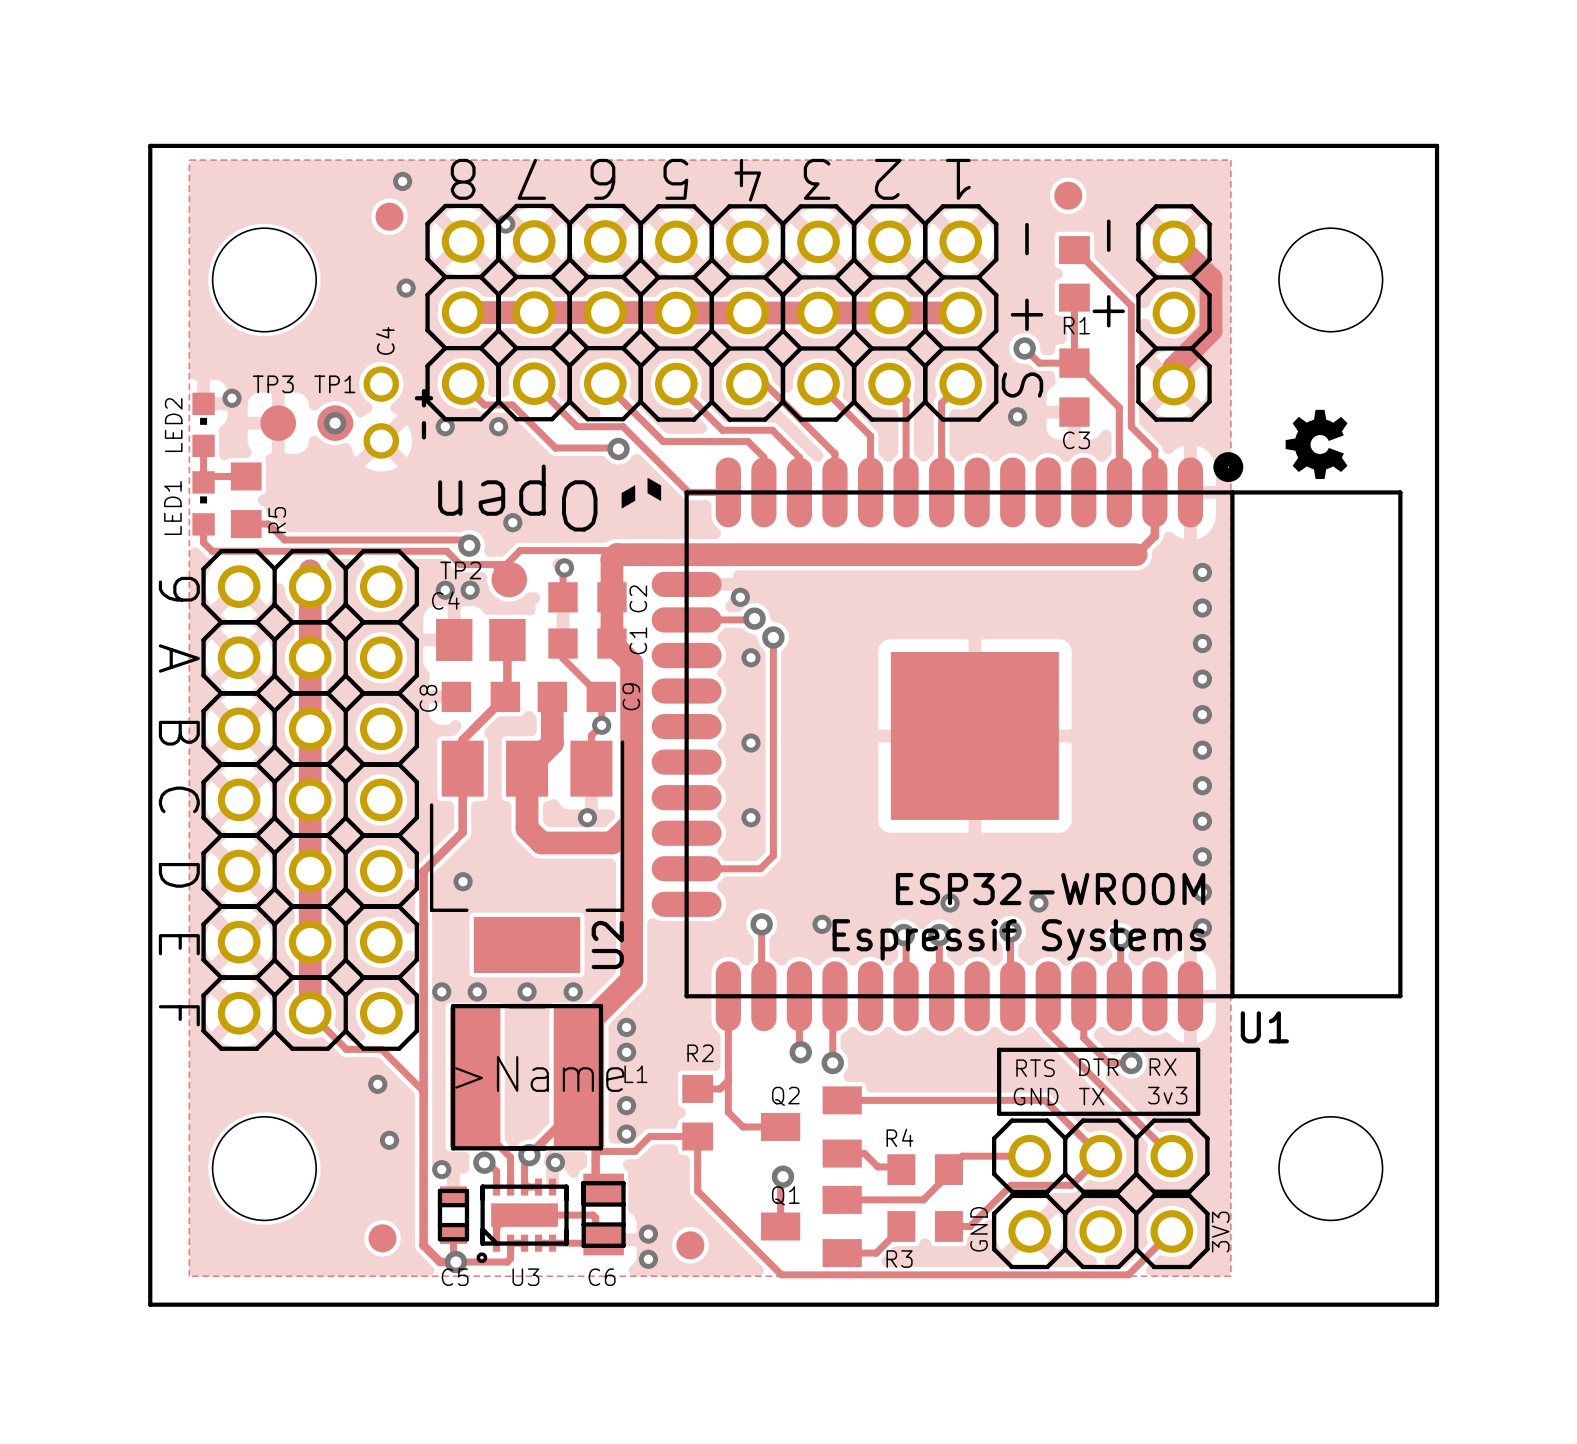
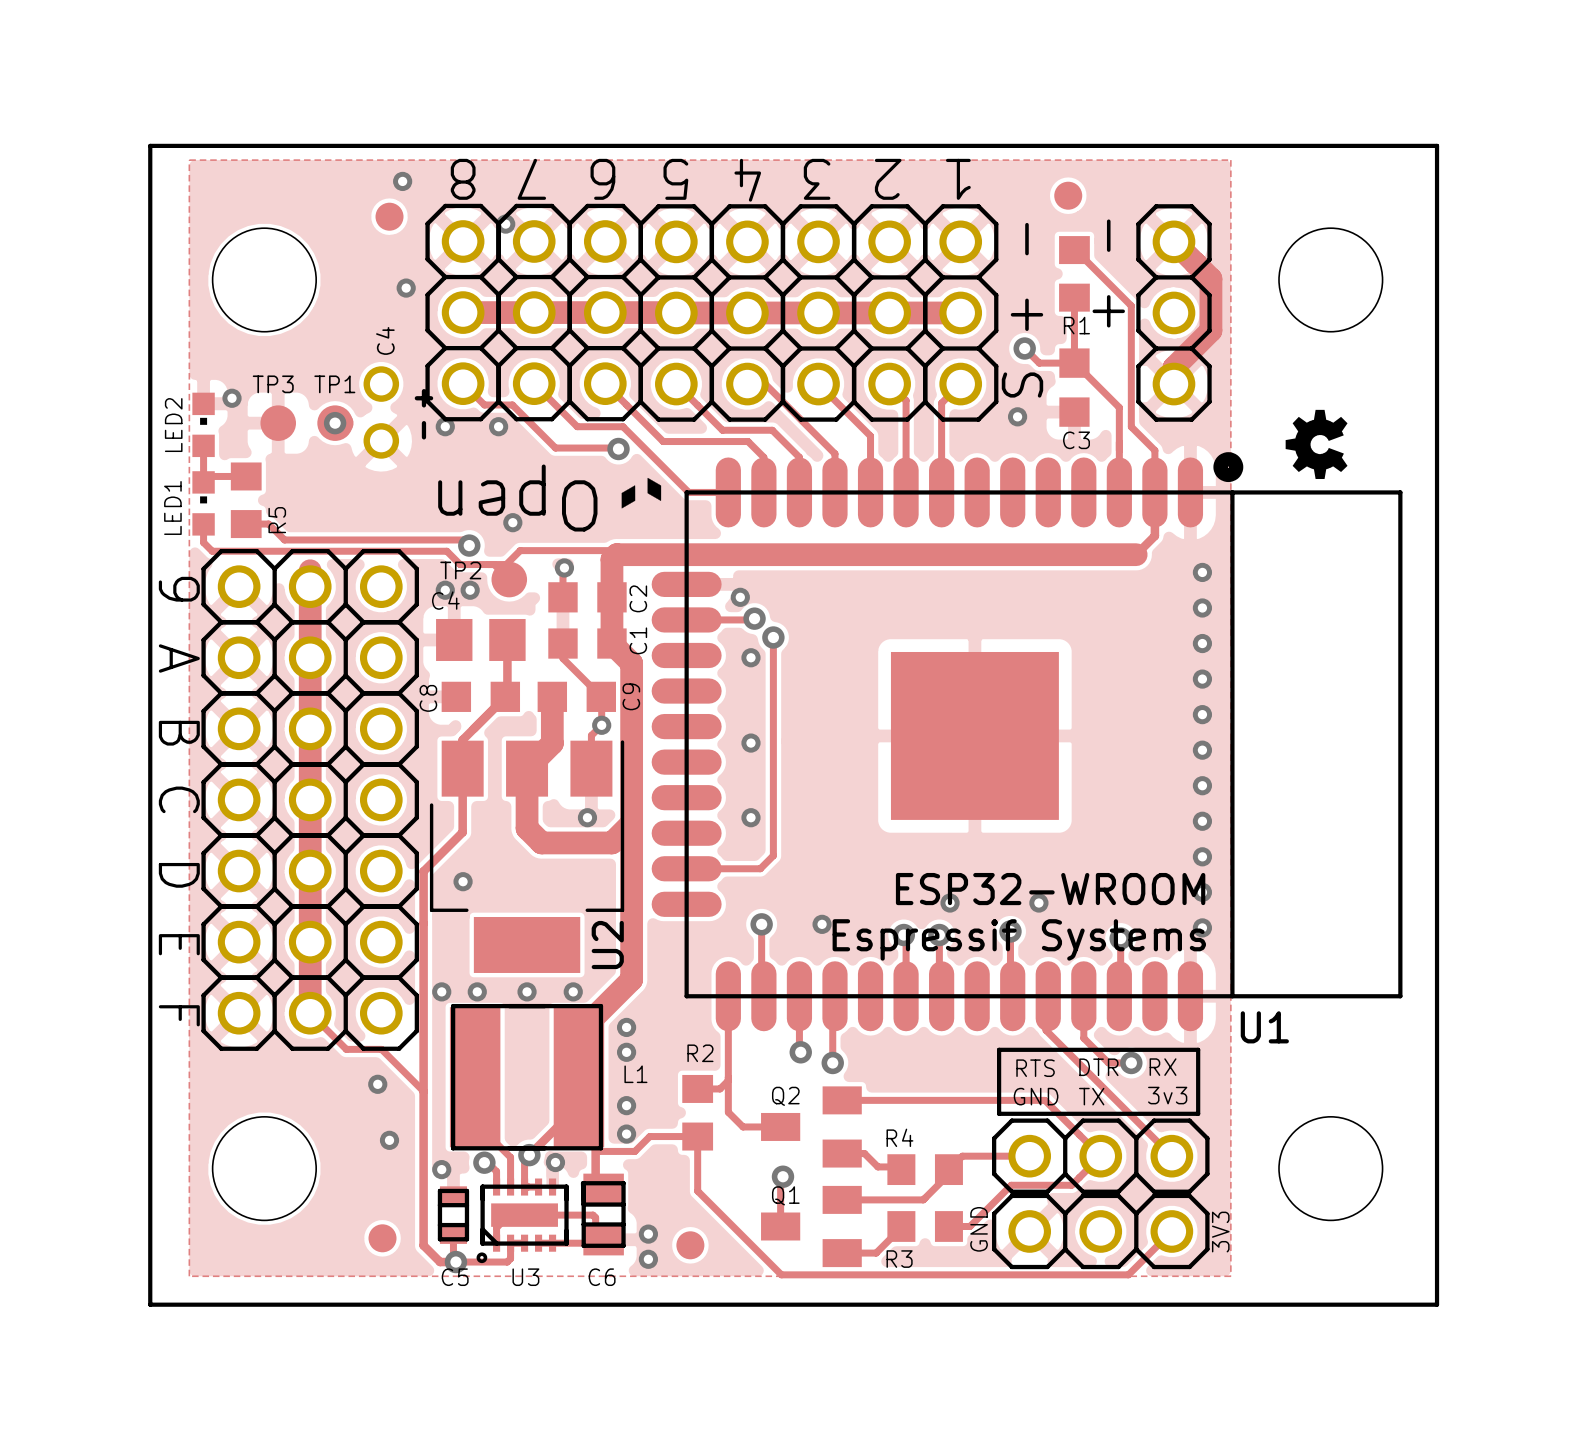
L1 text: >Name (539, 1073) -> none

